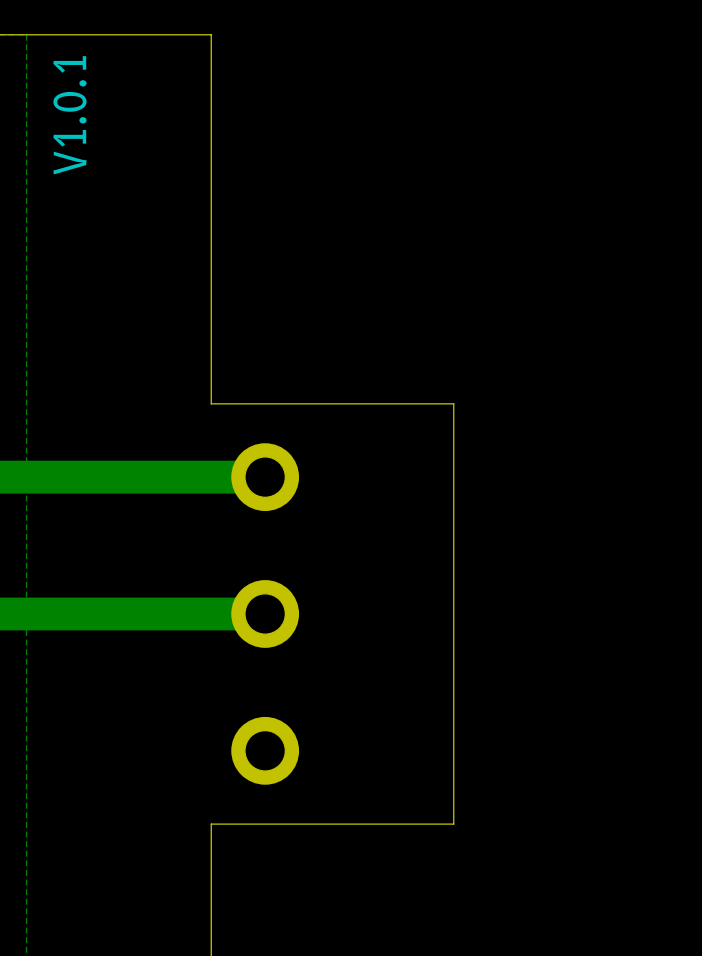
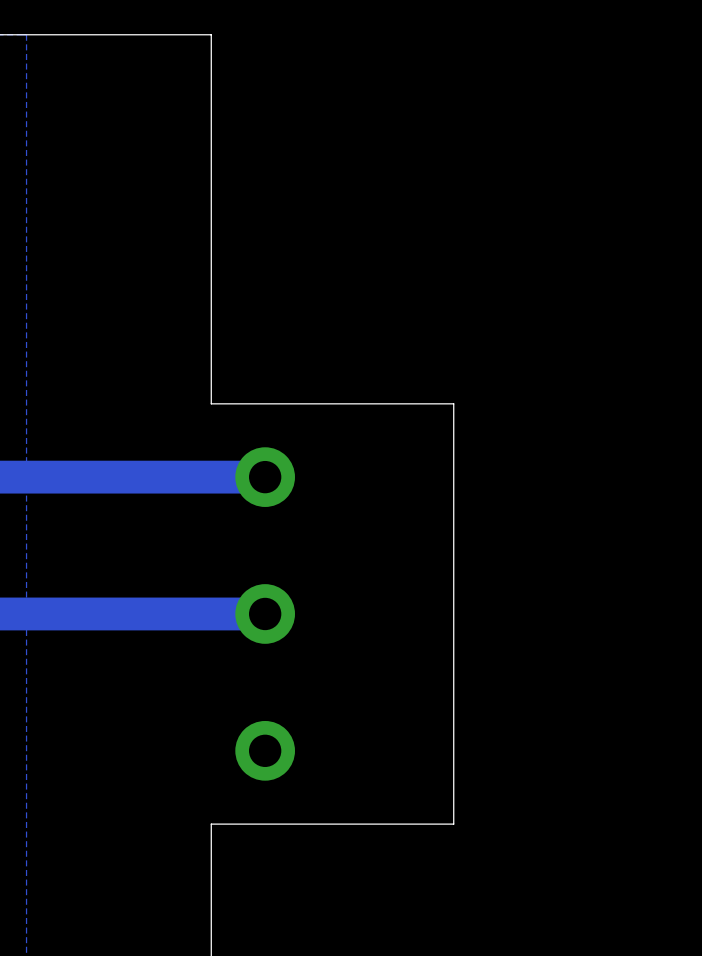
text: V1.0.1 (69, 115) -> none
part footprint: [231, 443, 300, 785] -> [235, 447, 296, 781]

